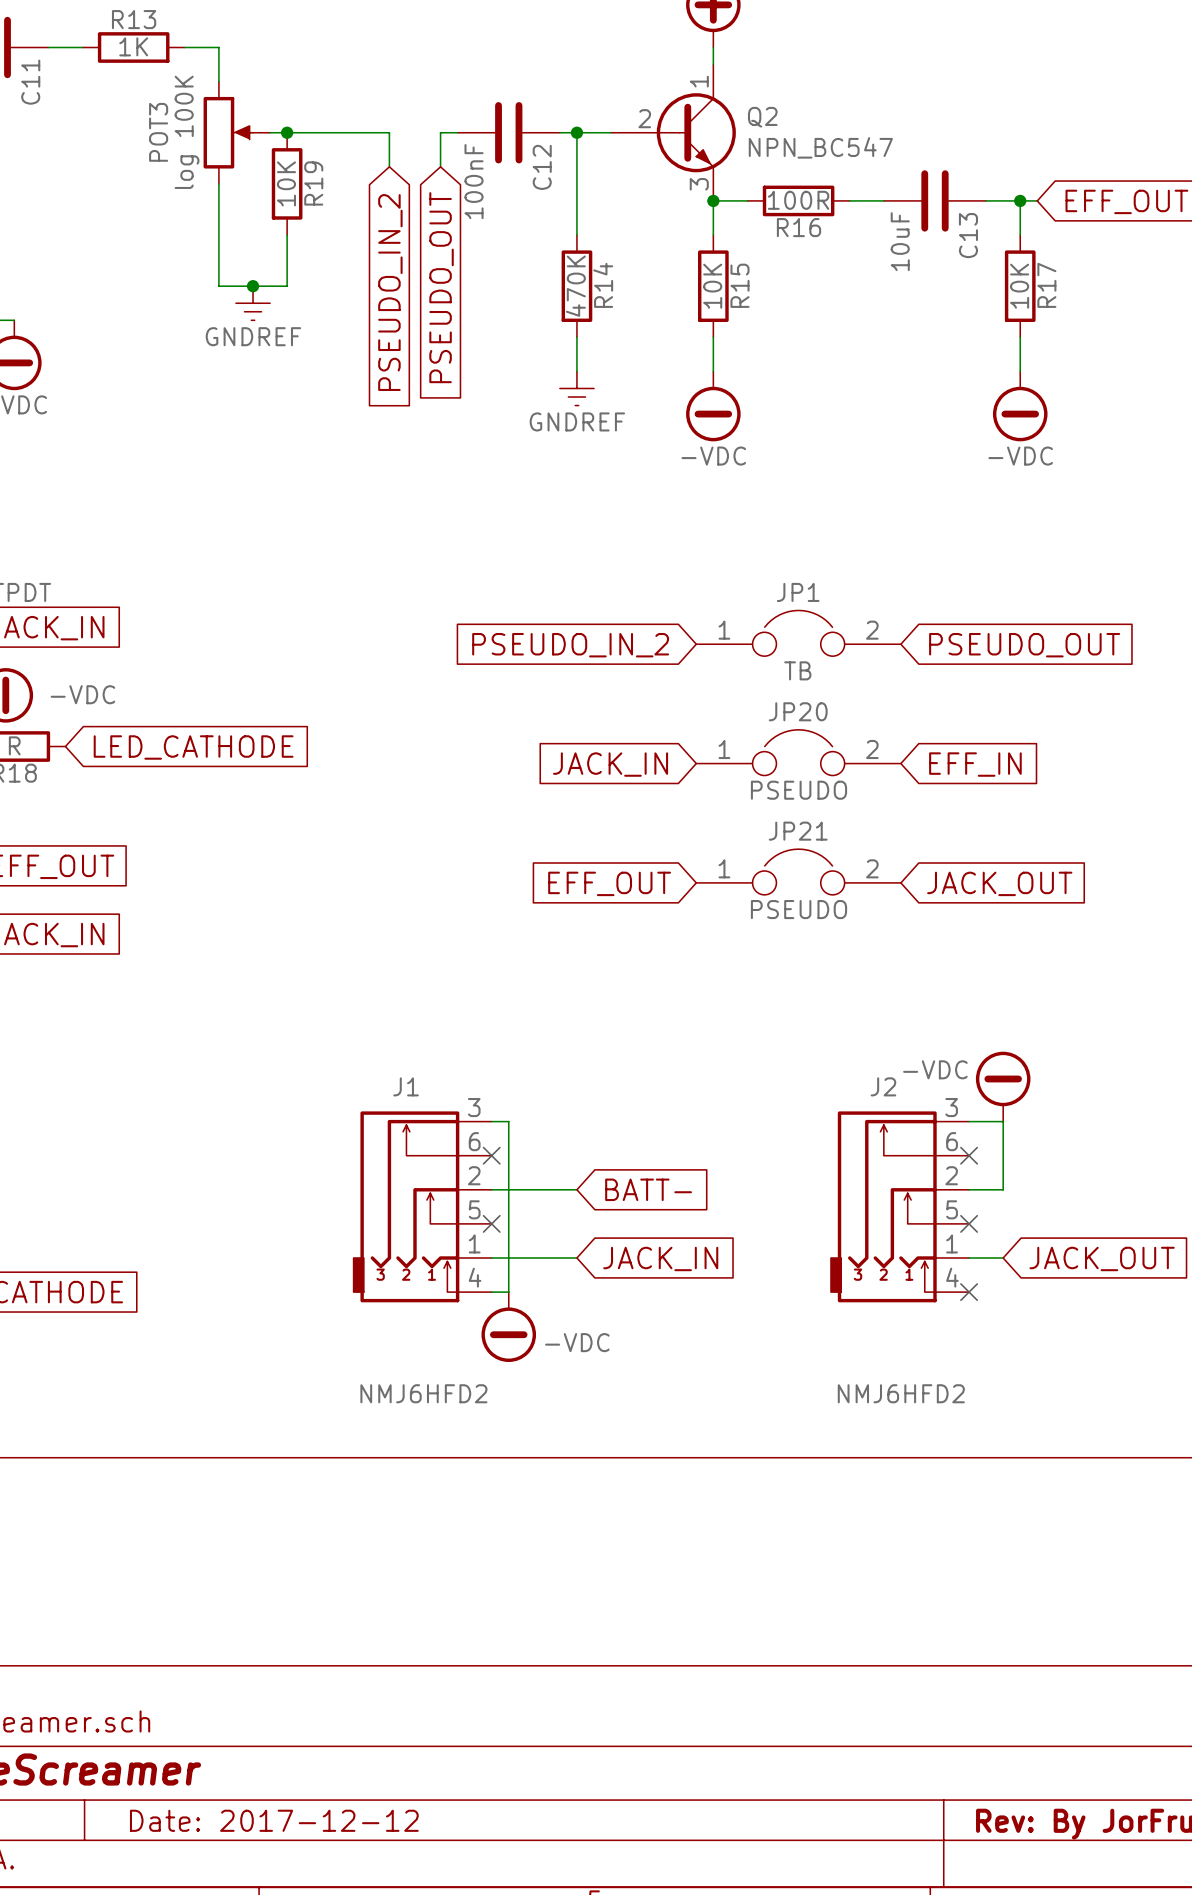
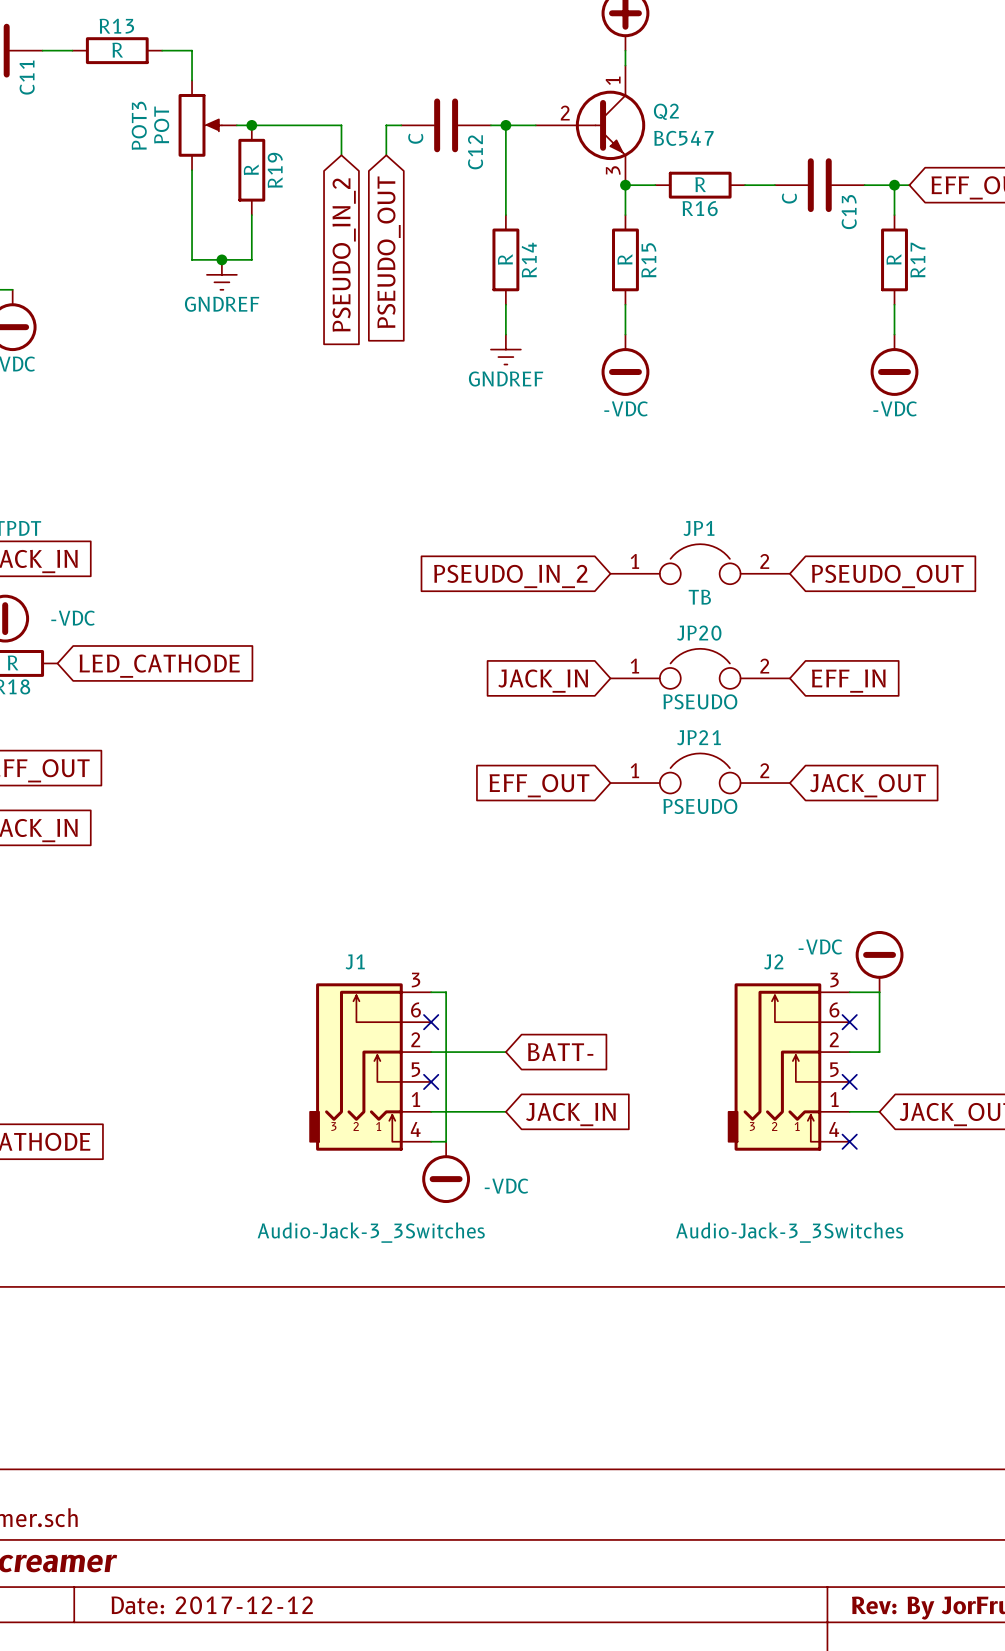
R13 value: 1K (133, 46) -> R (117, 50)
POT3 value: log 100K (187, 132) -> POT (161, 125)
Q2 value: NPN_BC547 (820, 147) -> BC547 (683, 138)
C12 value: 100nF (474, 181) -> C (415, 138)
R19 value: 10K (286, 183) -> R (251, 169)
R16 value: 100R (798, 200) -> R (700, 184)
C13 value: 10uF (900, 241) -> C (789, 198)
R14 value: 470K (575, 286) -> R (505, 259)
R15 value: 10K (712, 286) -> R (624, 259)
R17 value: 10K (1019, 286) -> R (893, 259)
J1 value: NMJ6HFD2 (423, 1393) -> Audio-Jack-3_3Switches (371, 1232)
J2 value: NMJ6HFD2 (901, 1393) -> Audio-Jack-3_3Switches (789, 1232)

